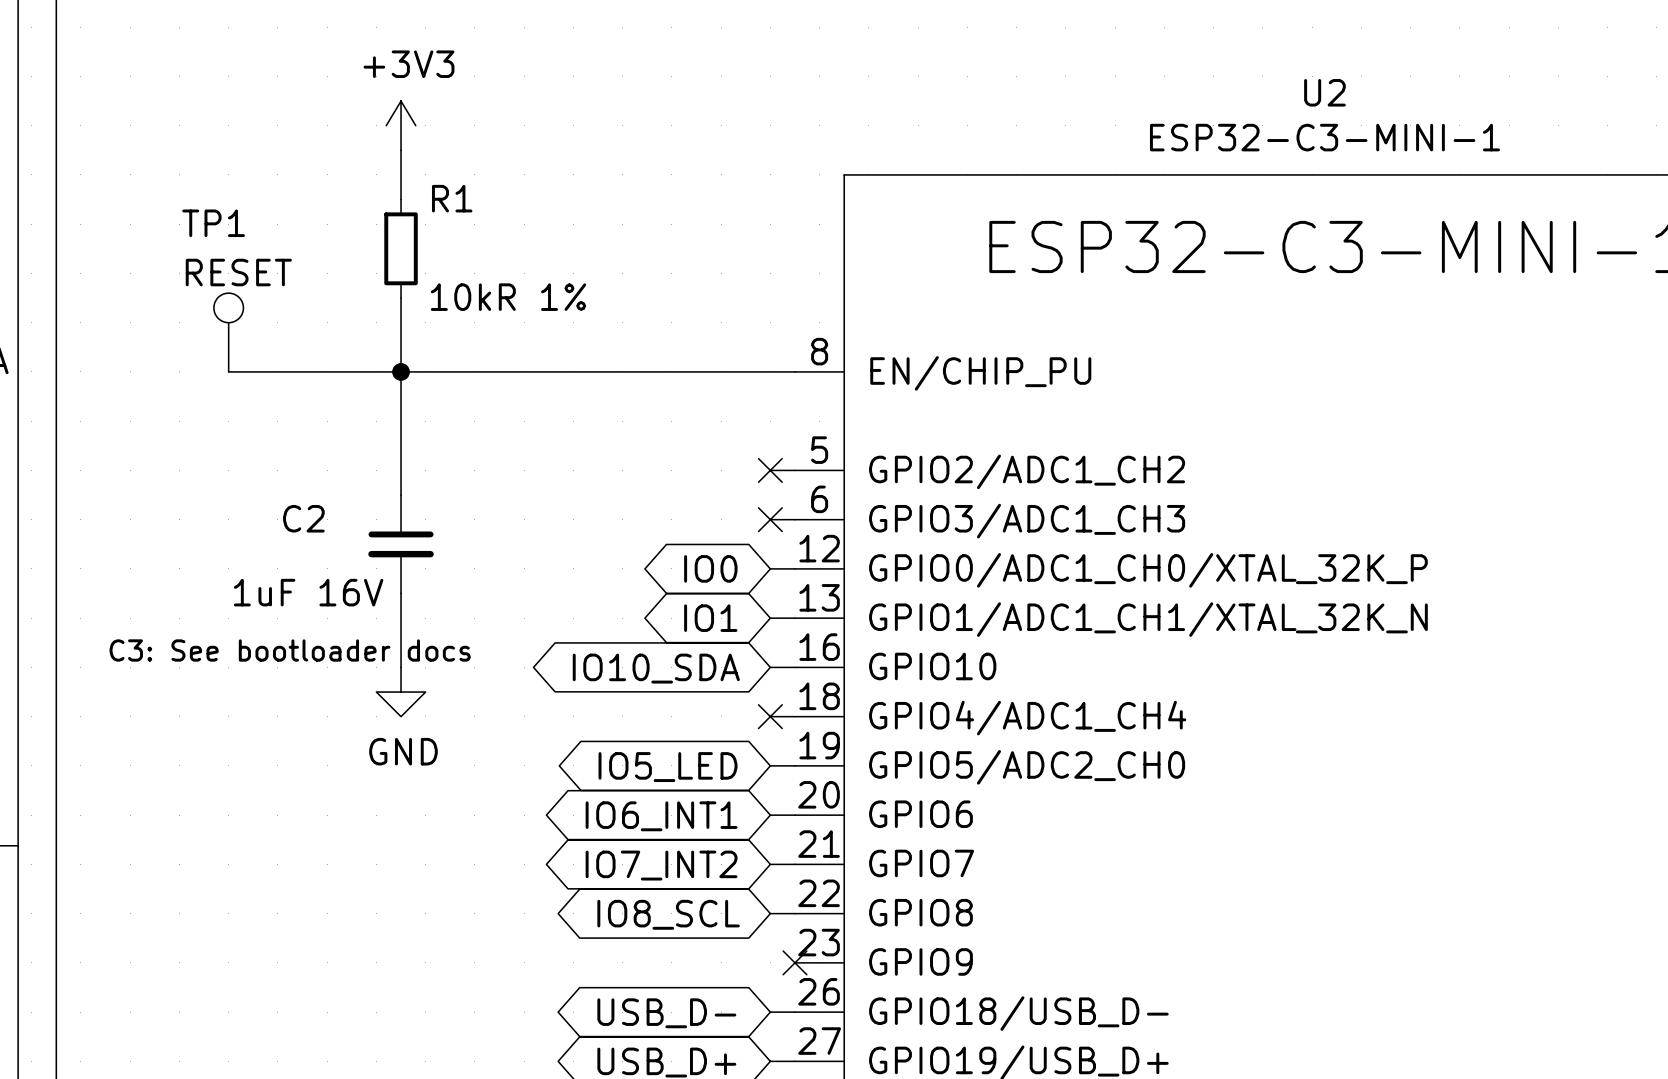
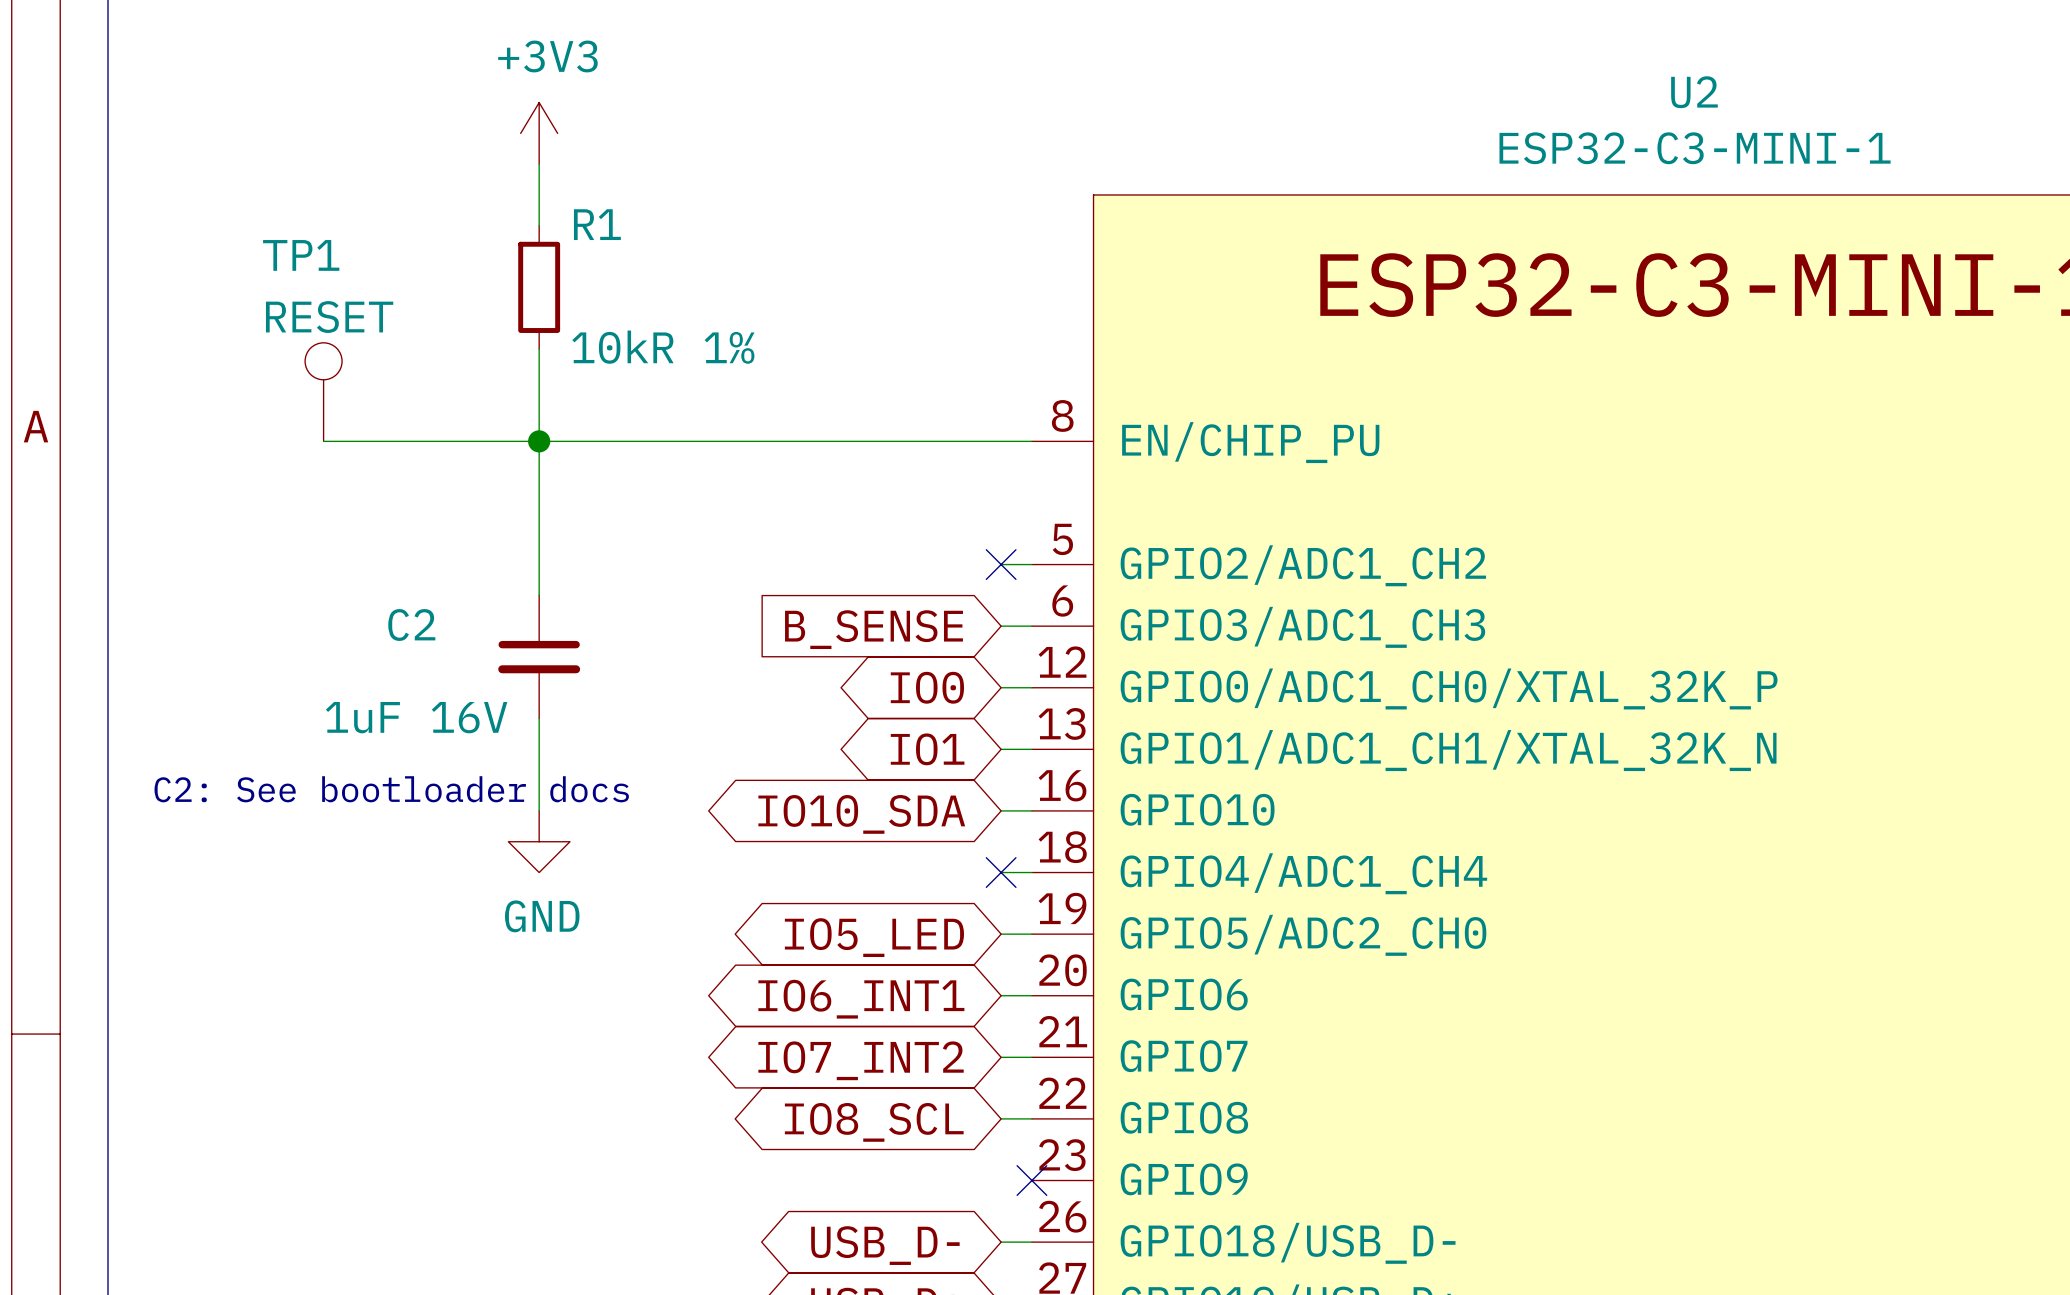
no-connect mark: (770, 519) -> none
global label: none -> B_SENSE (874, 629)
text: C3: See bootloader docs (290, 650) -> C2: See bootloader docs (391, 789)

